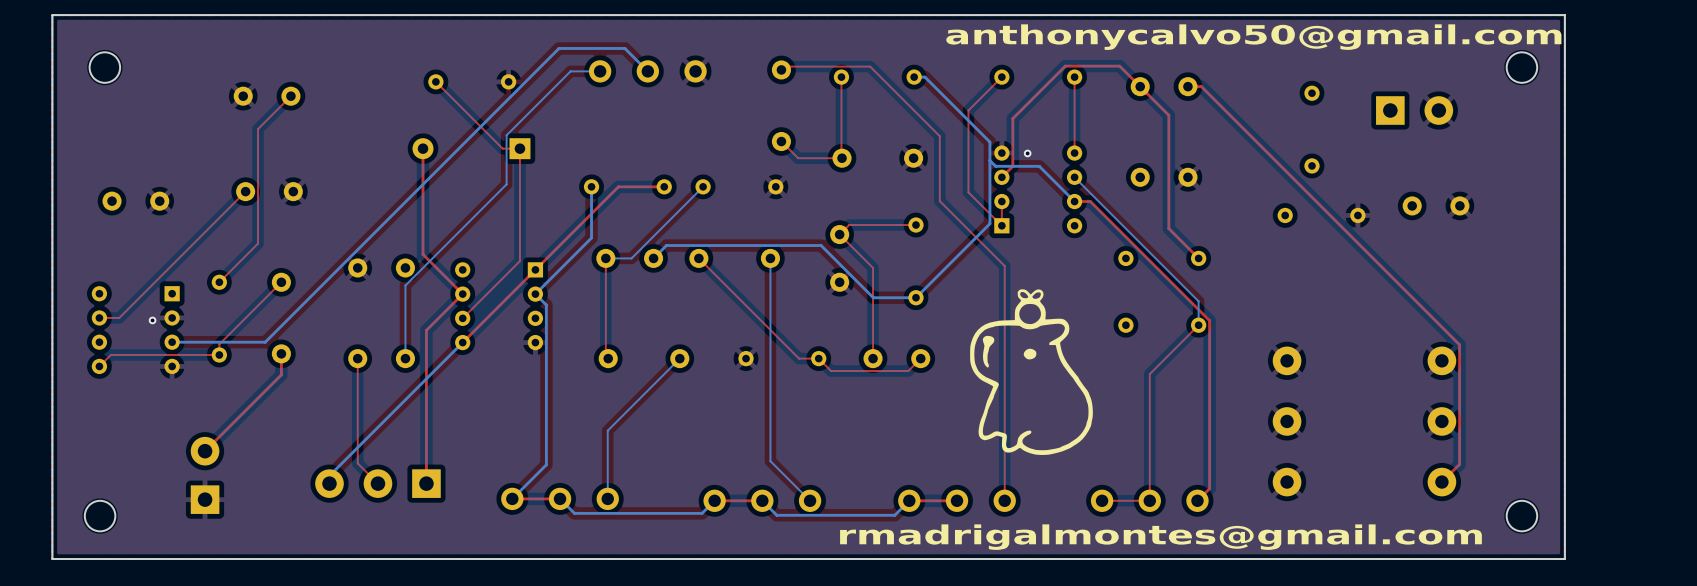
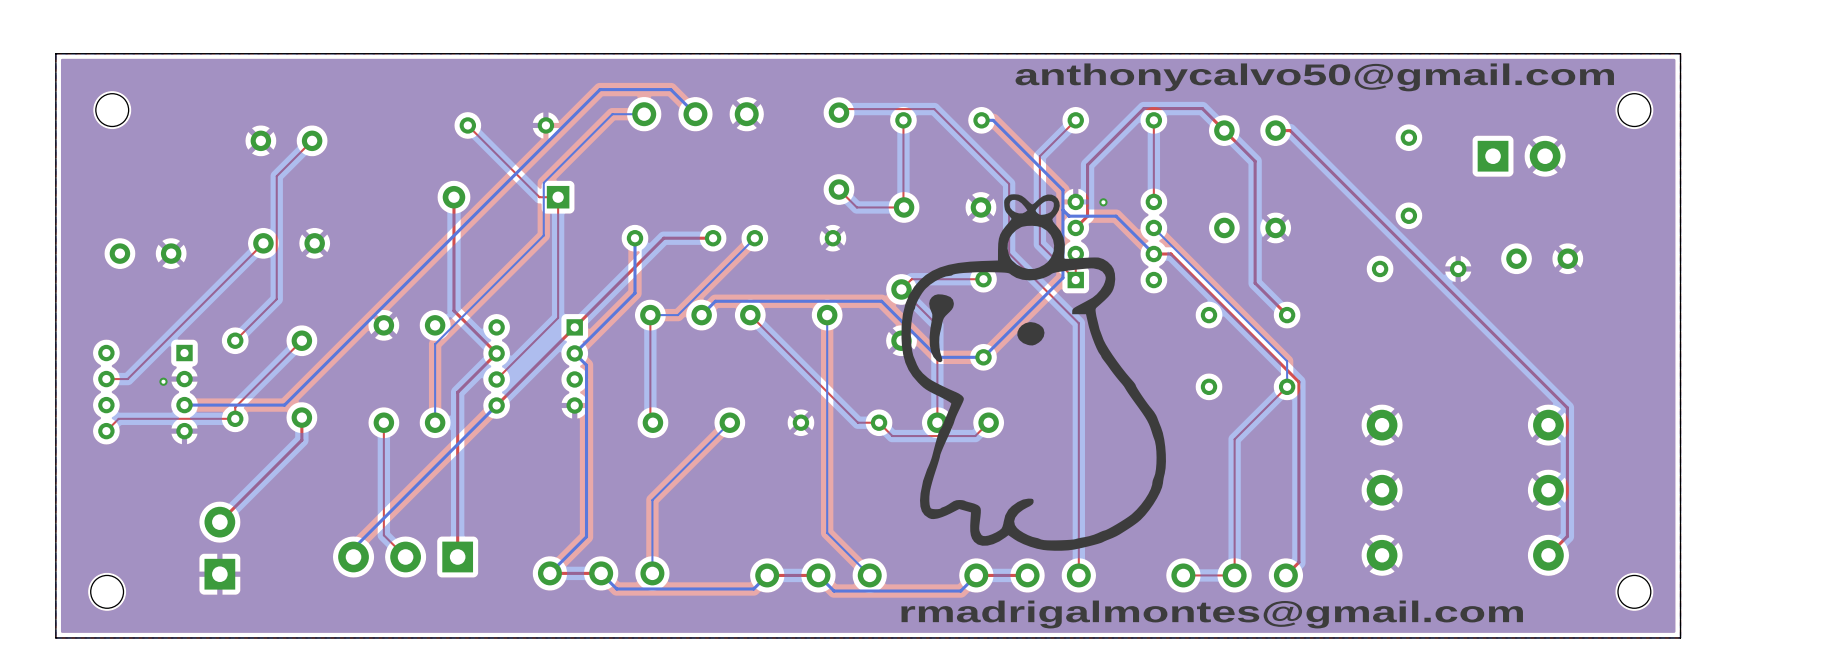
drawing: none -> [901, 194, 1166, 551]
drawing: [970, 289, 1093, 455] -> none

